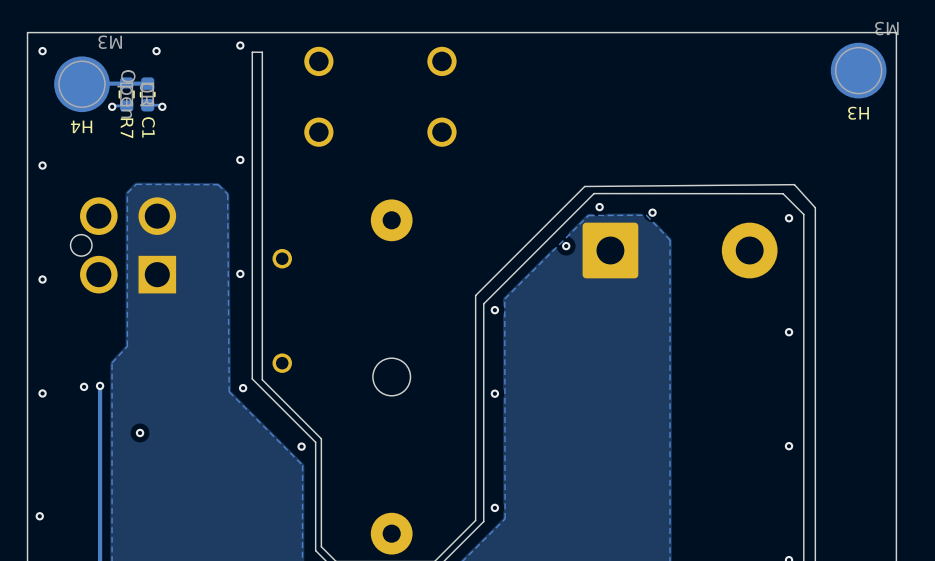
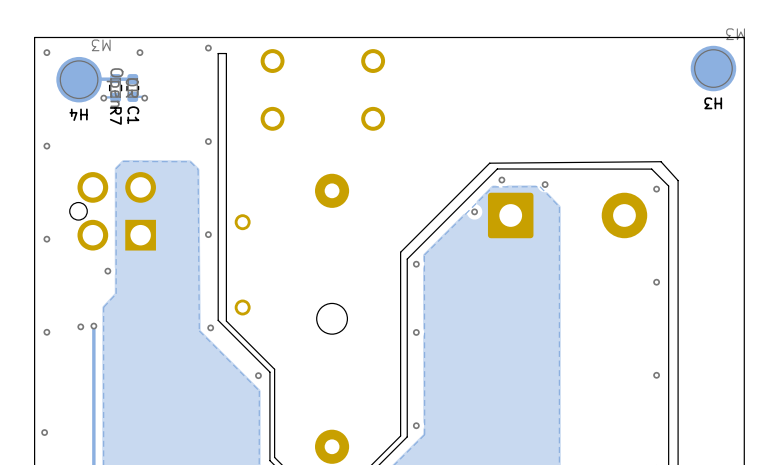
via: none -> (107, 271)
via: (140, 432) -> none

